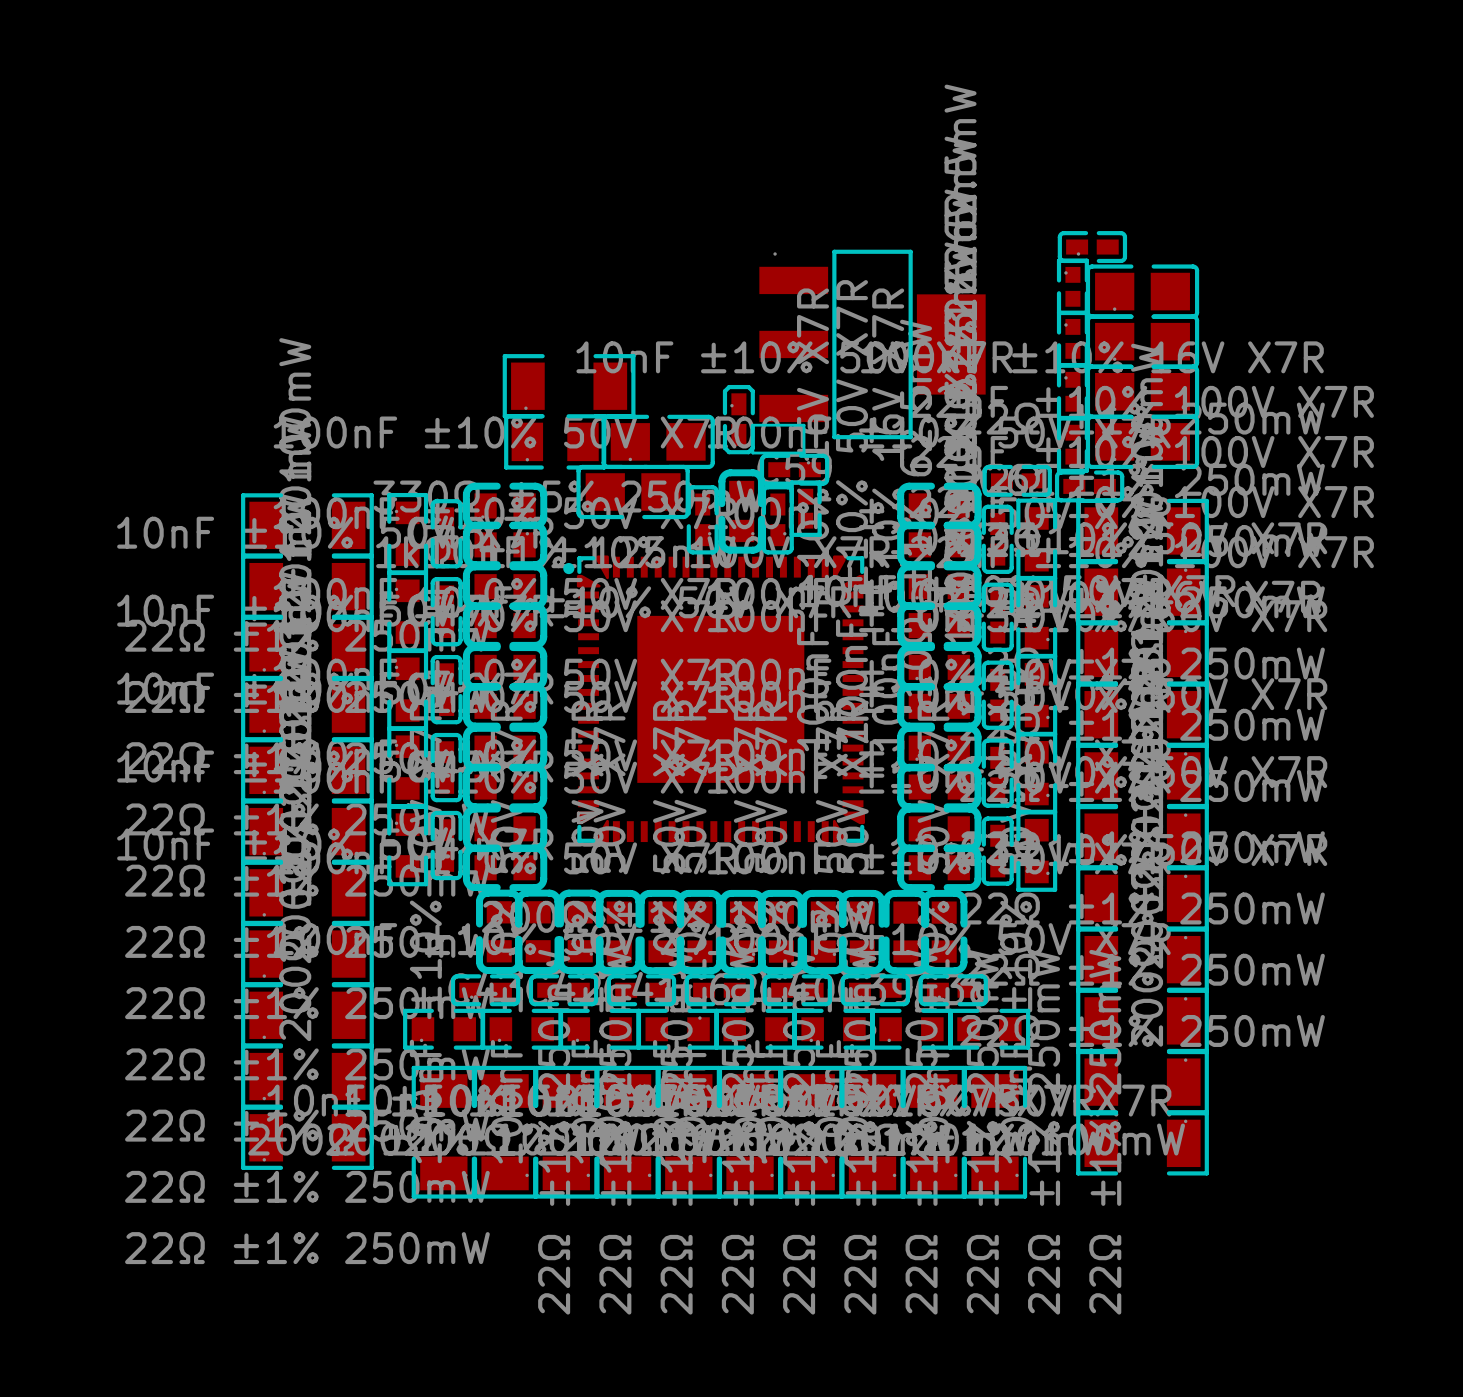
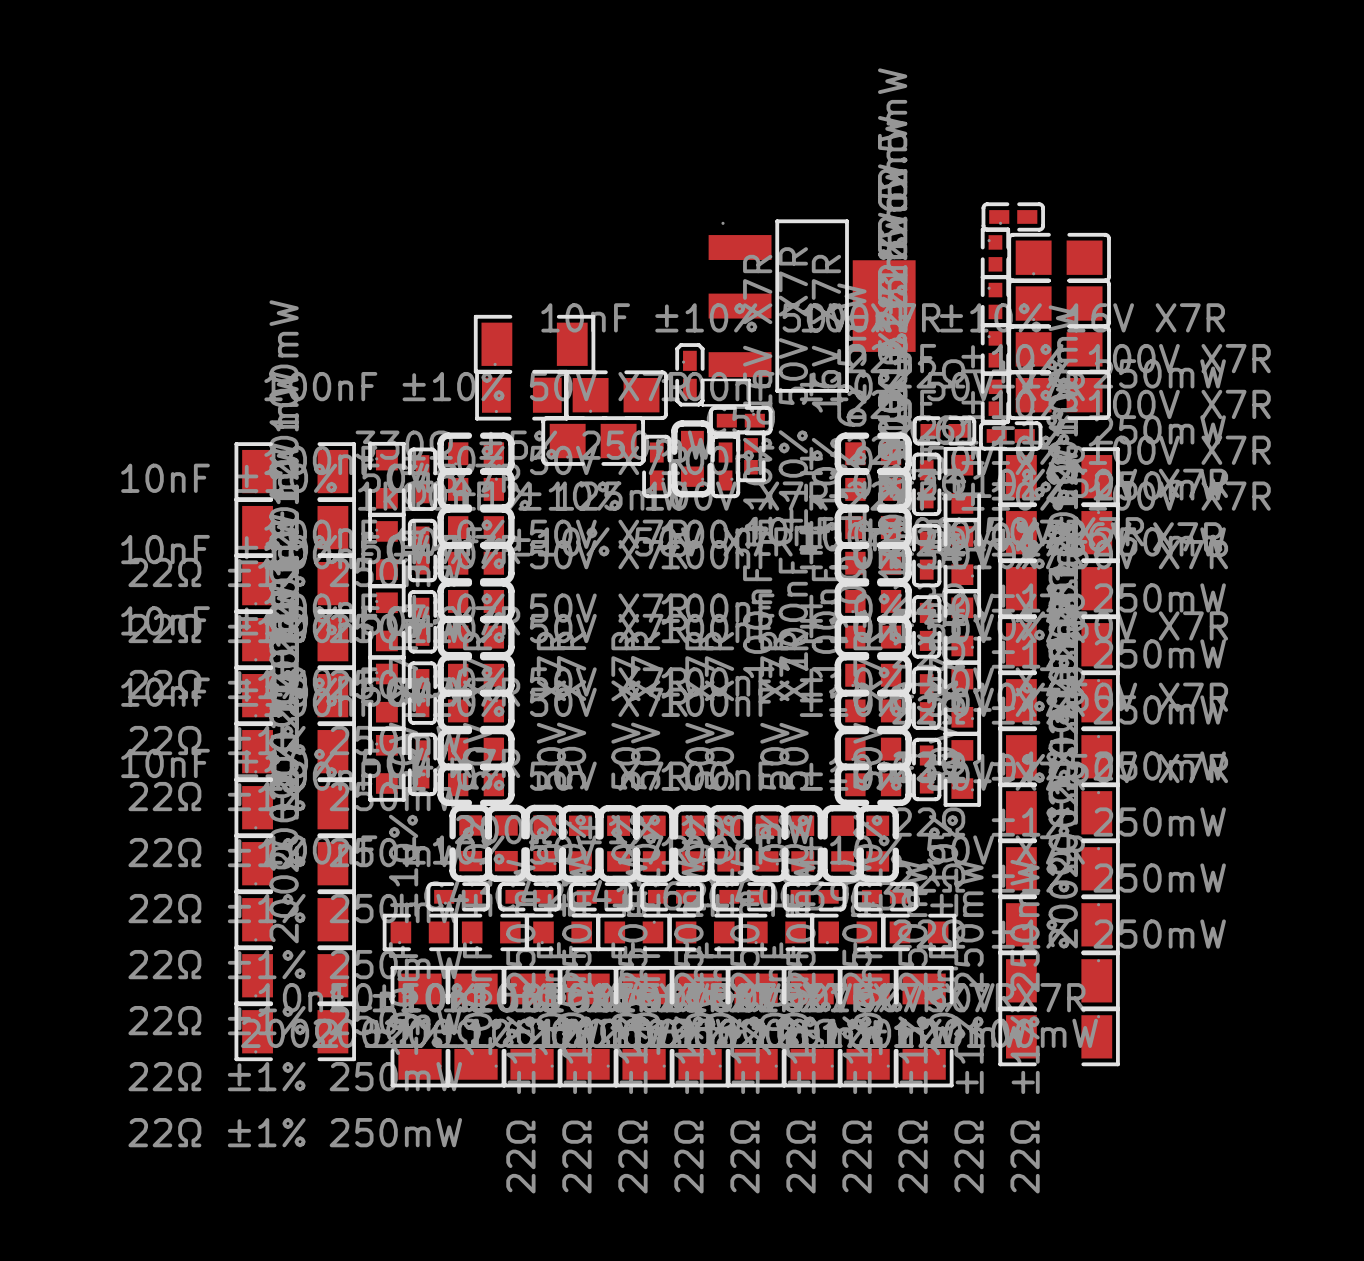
part: (714, 699) -> none

